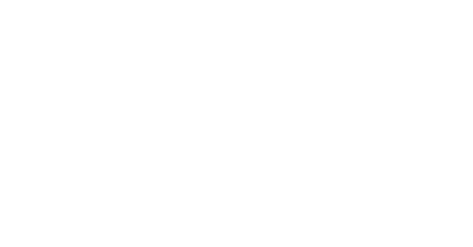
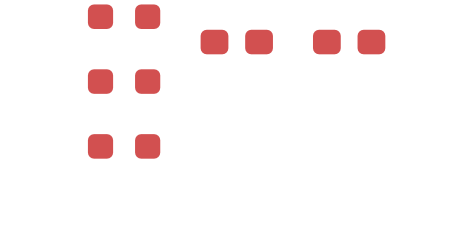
part: none -> (124, 16)
part: none -> (236, 42)
part: none -> (349, 42)
part: none -> (124, 81)
part: none -> (124, 146)

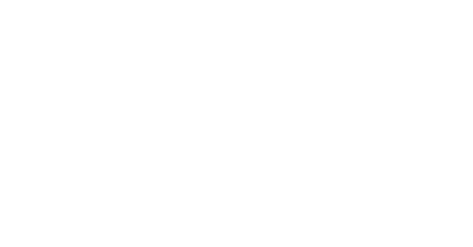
part: (124, 16) -> none
part: (236, 42) -> none
part: (349, 42) -> none
part: (124, 81) -> none
part: (124, 146) -> none

